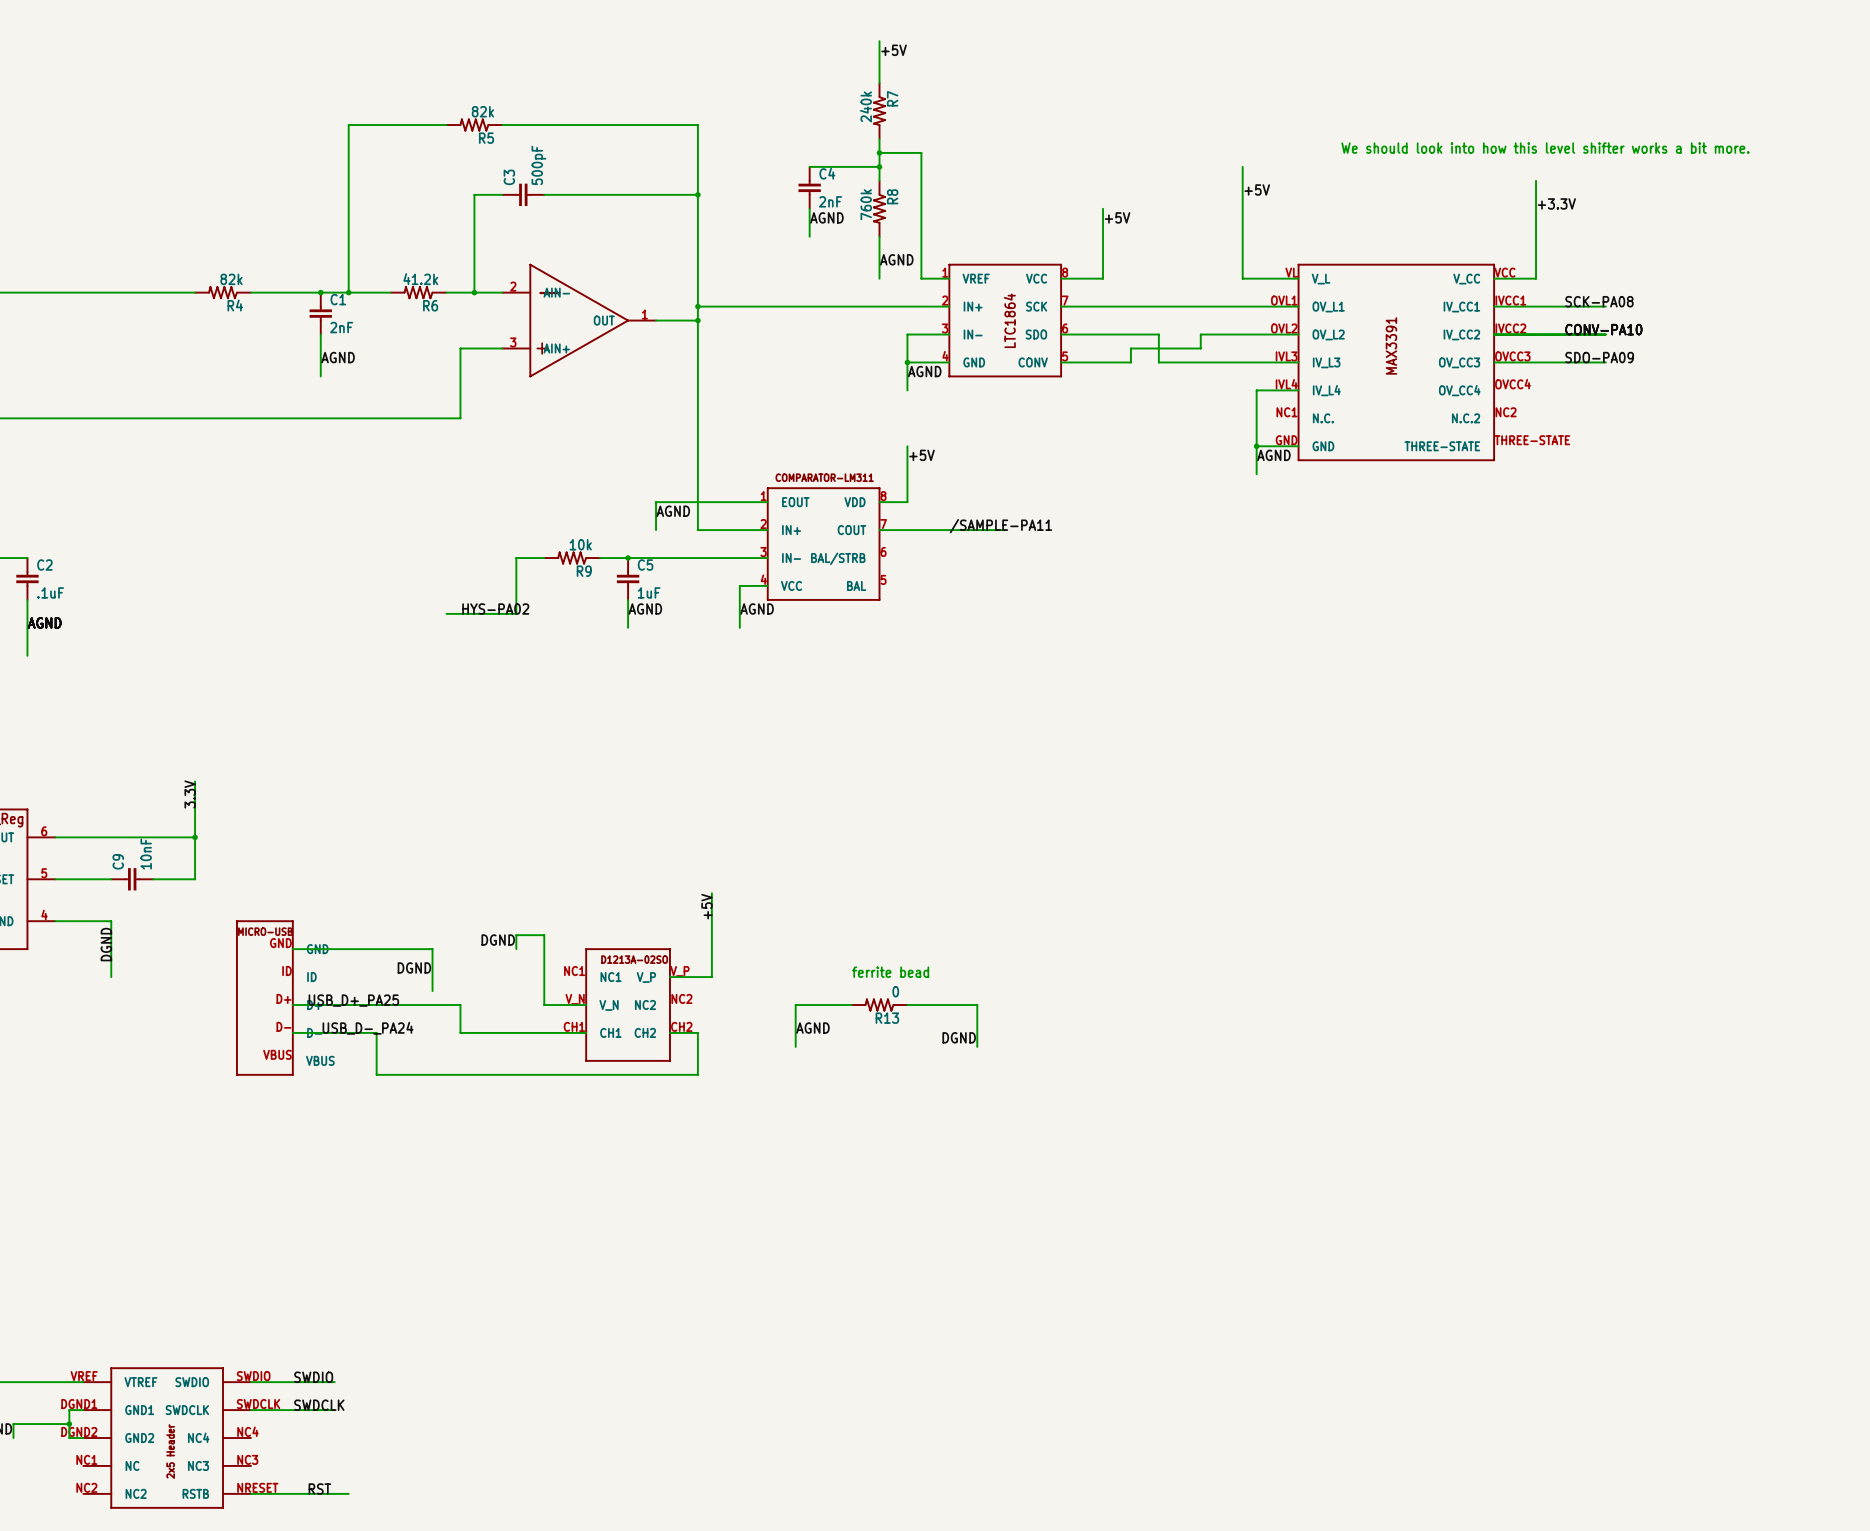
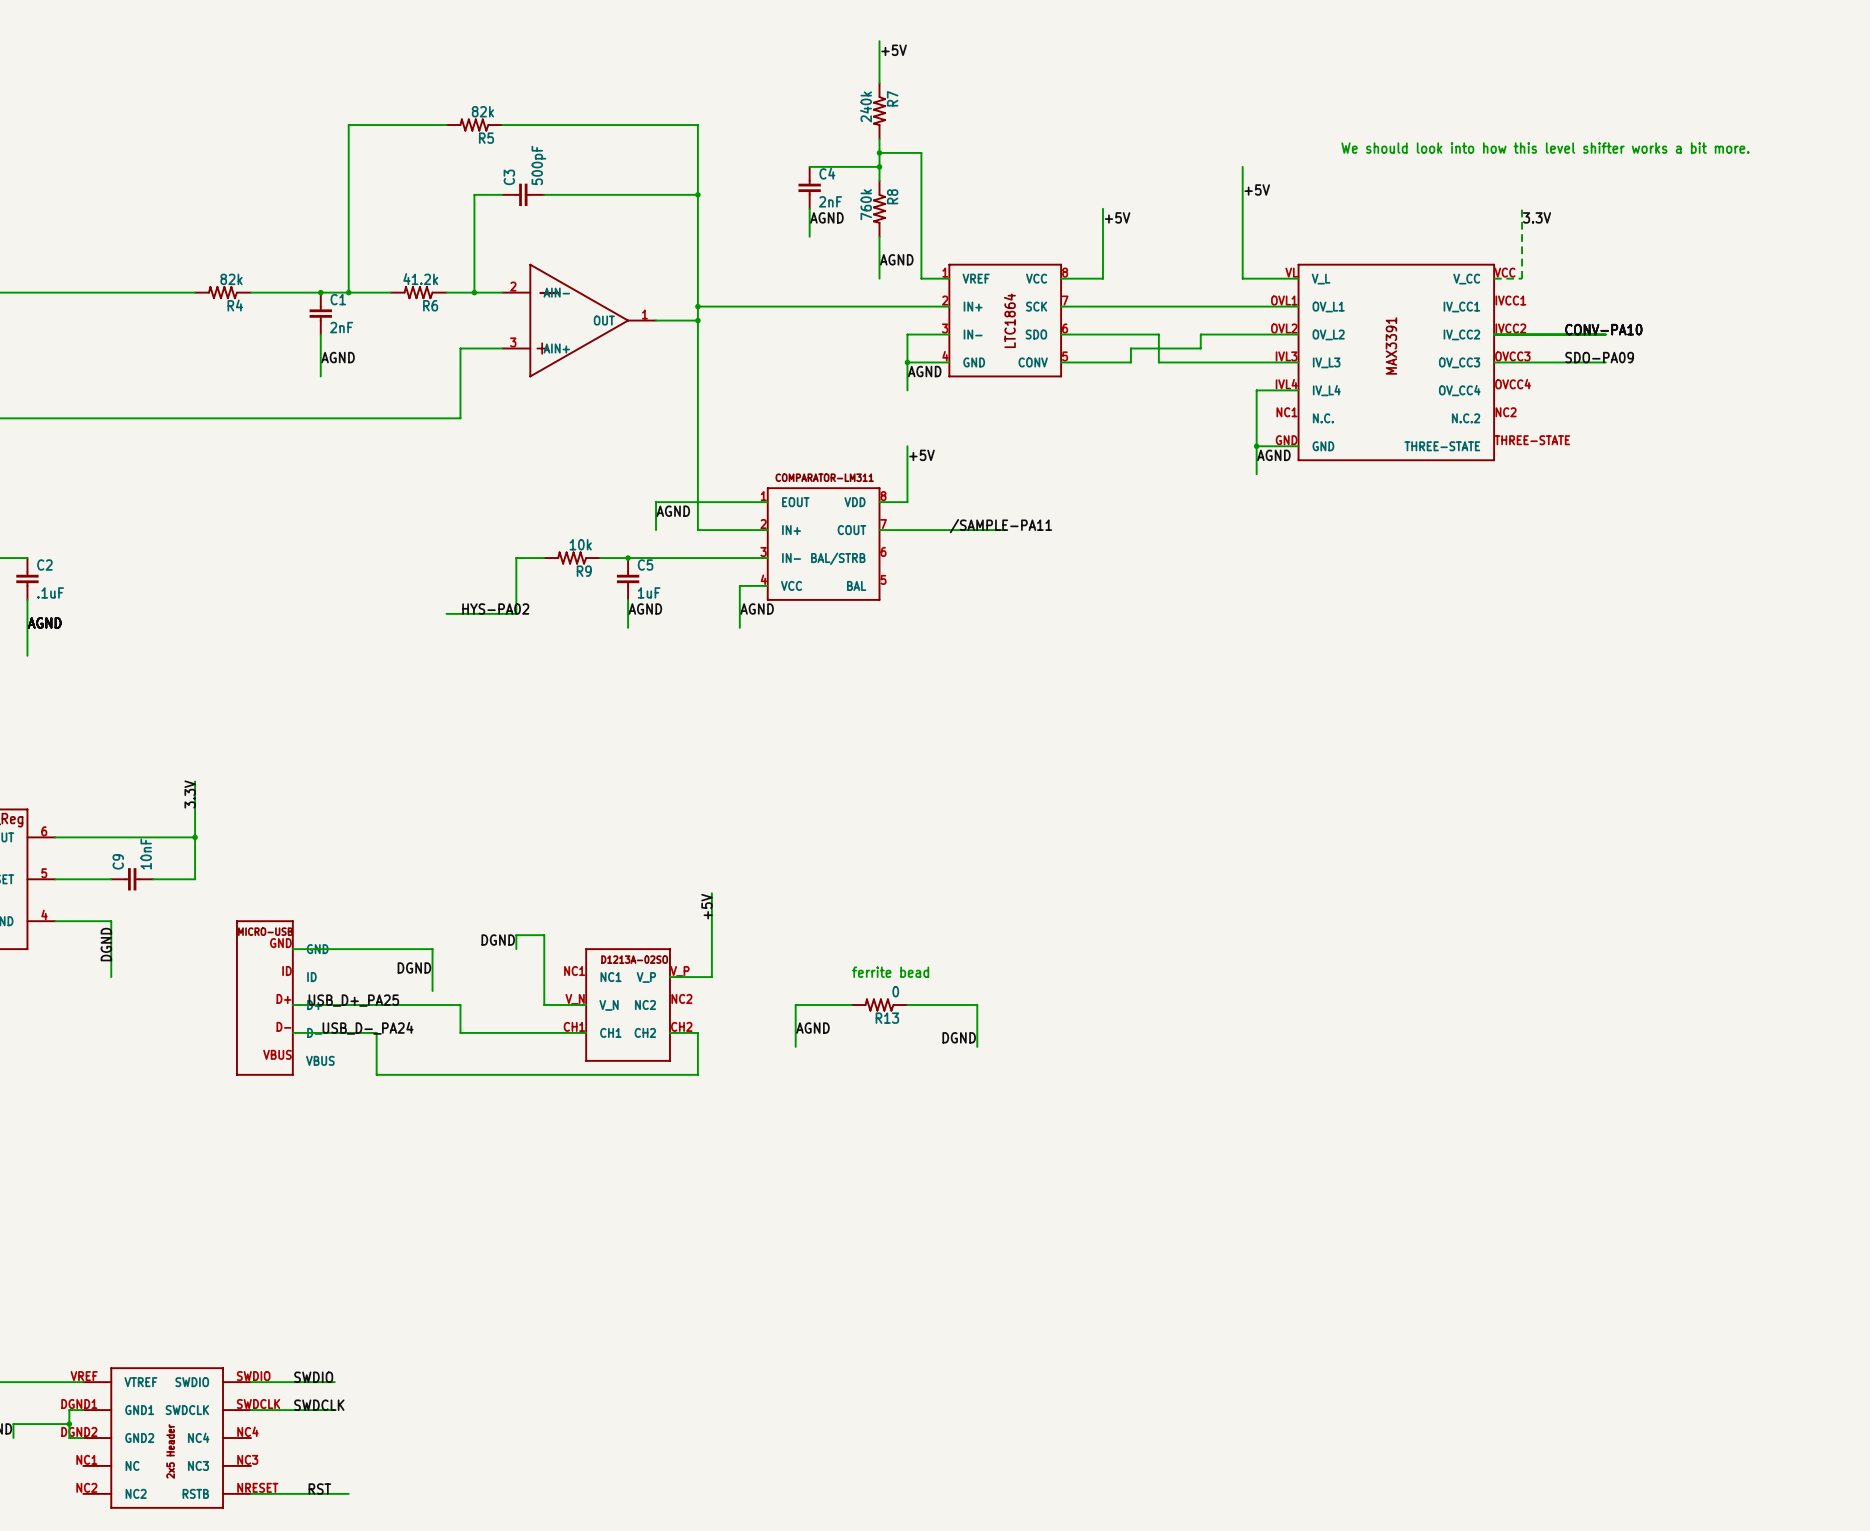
wire: (1536, 180) (1536, 278) (1494, 278) -> (1522, 208) (1522, 278) (1494, 278)
label: +3.3V (1556, 203) -> 3.3V (1537, 217)
label: SCK-PA08 (1599, 301) -> none
wire: (1494, 306) (1605, 306) -> none

